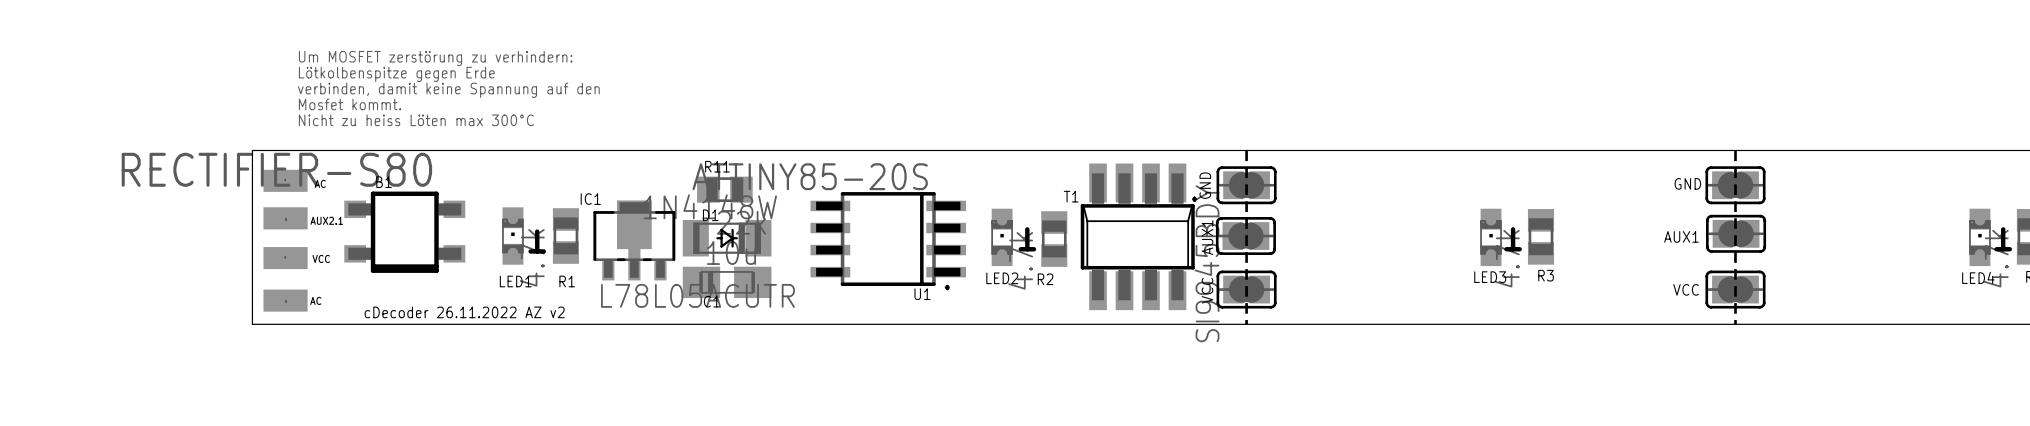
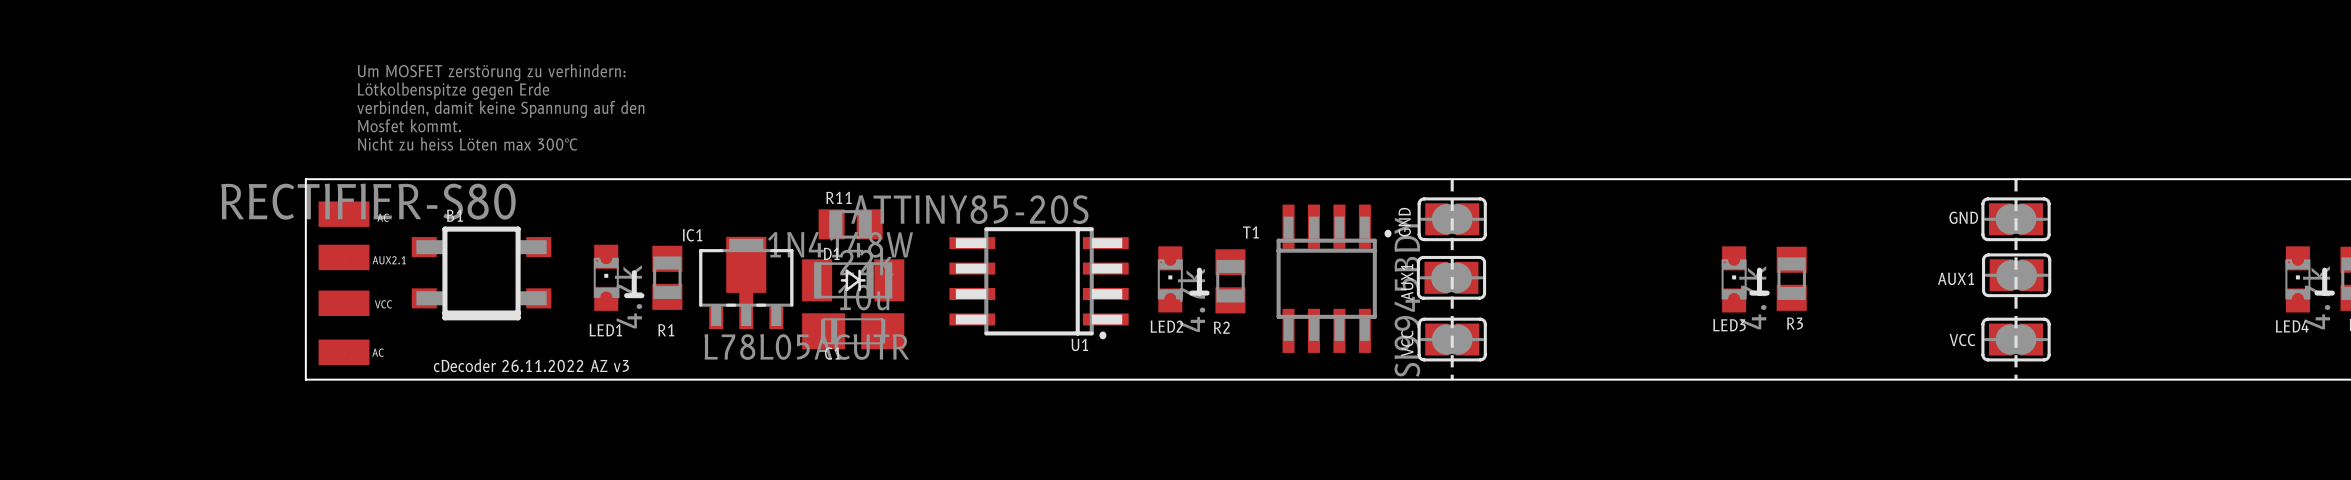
T1 footprint: [1080, 163, 1195, 311] -> [1276, 204, 1377, 353]
text: cDecoder 26.11.2022 AZ v2 (464, 312) -> cDecoder 26.11.2022 AZ v3 (531, 365)

